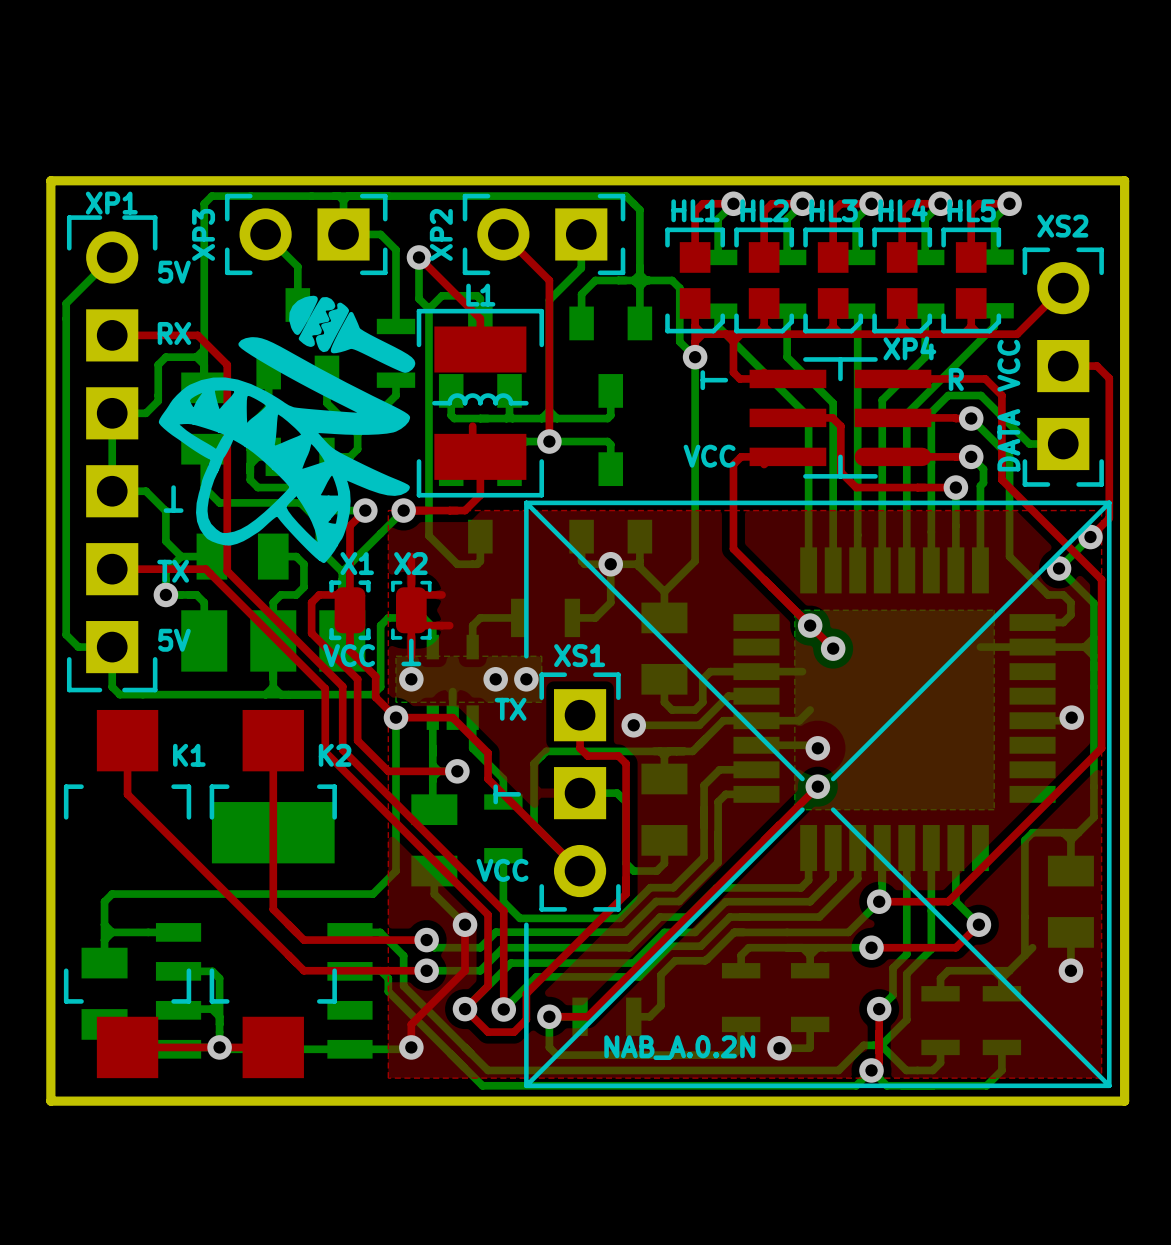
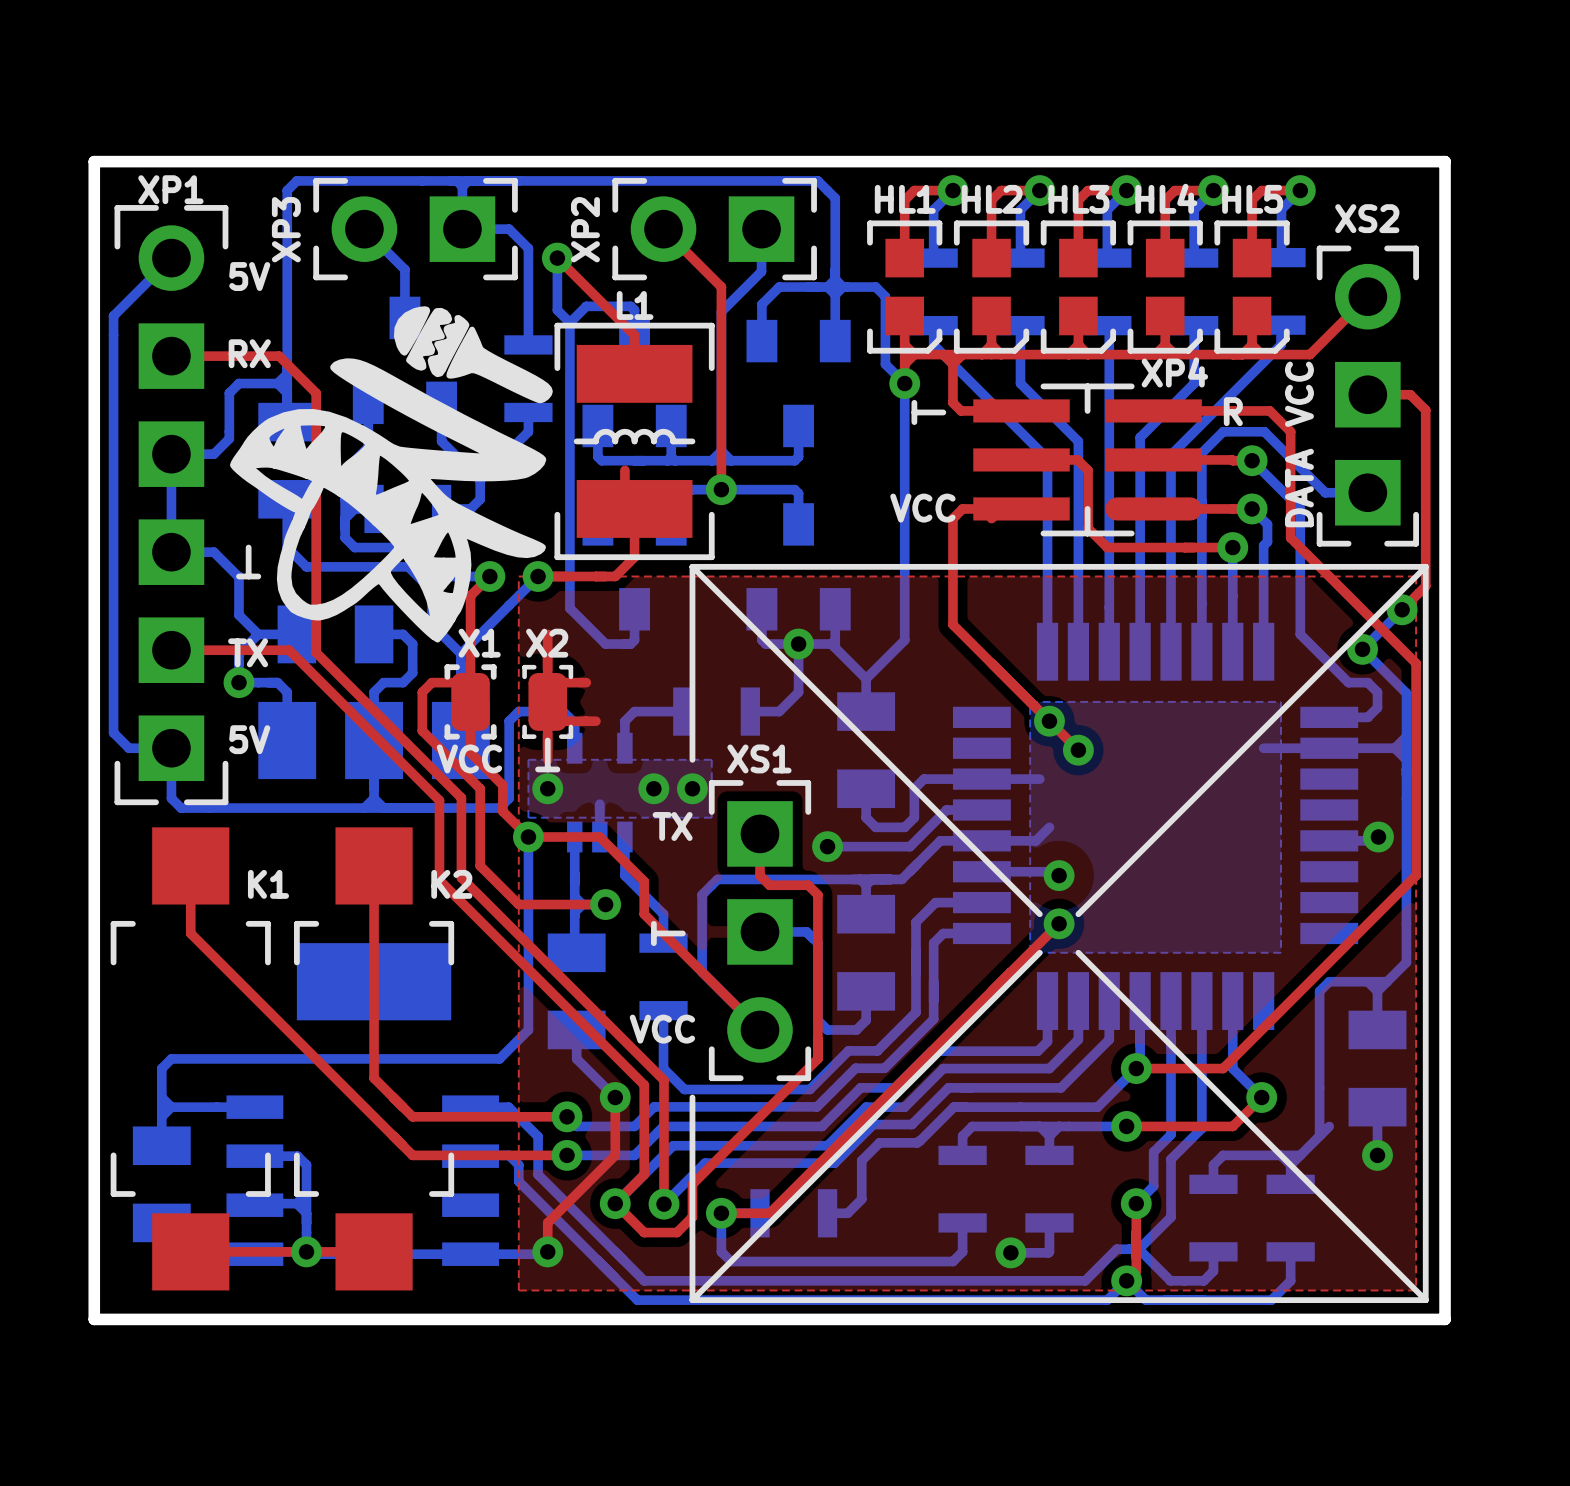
text: NAB_A.0.2N (679, 1047) -> none

